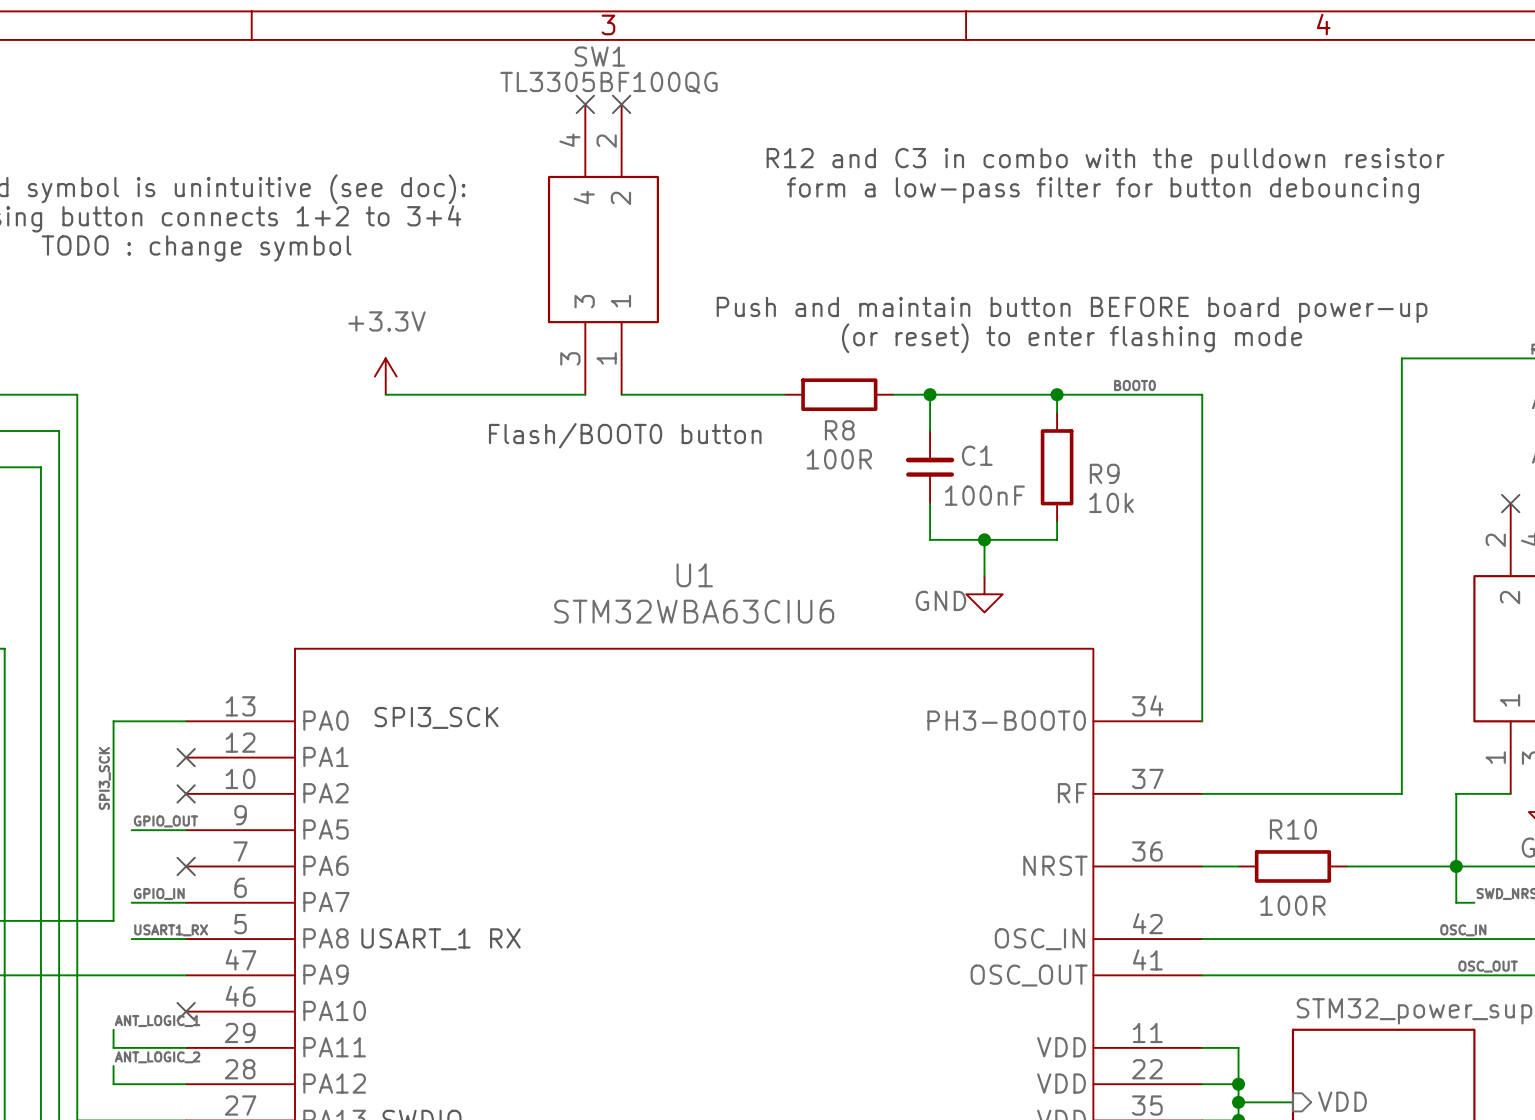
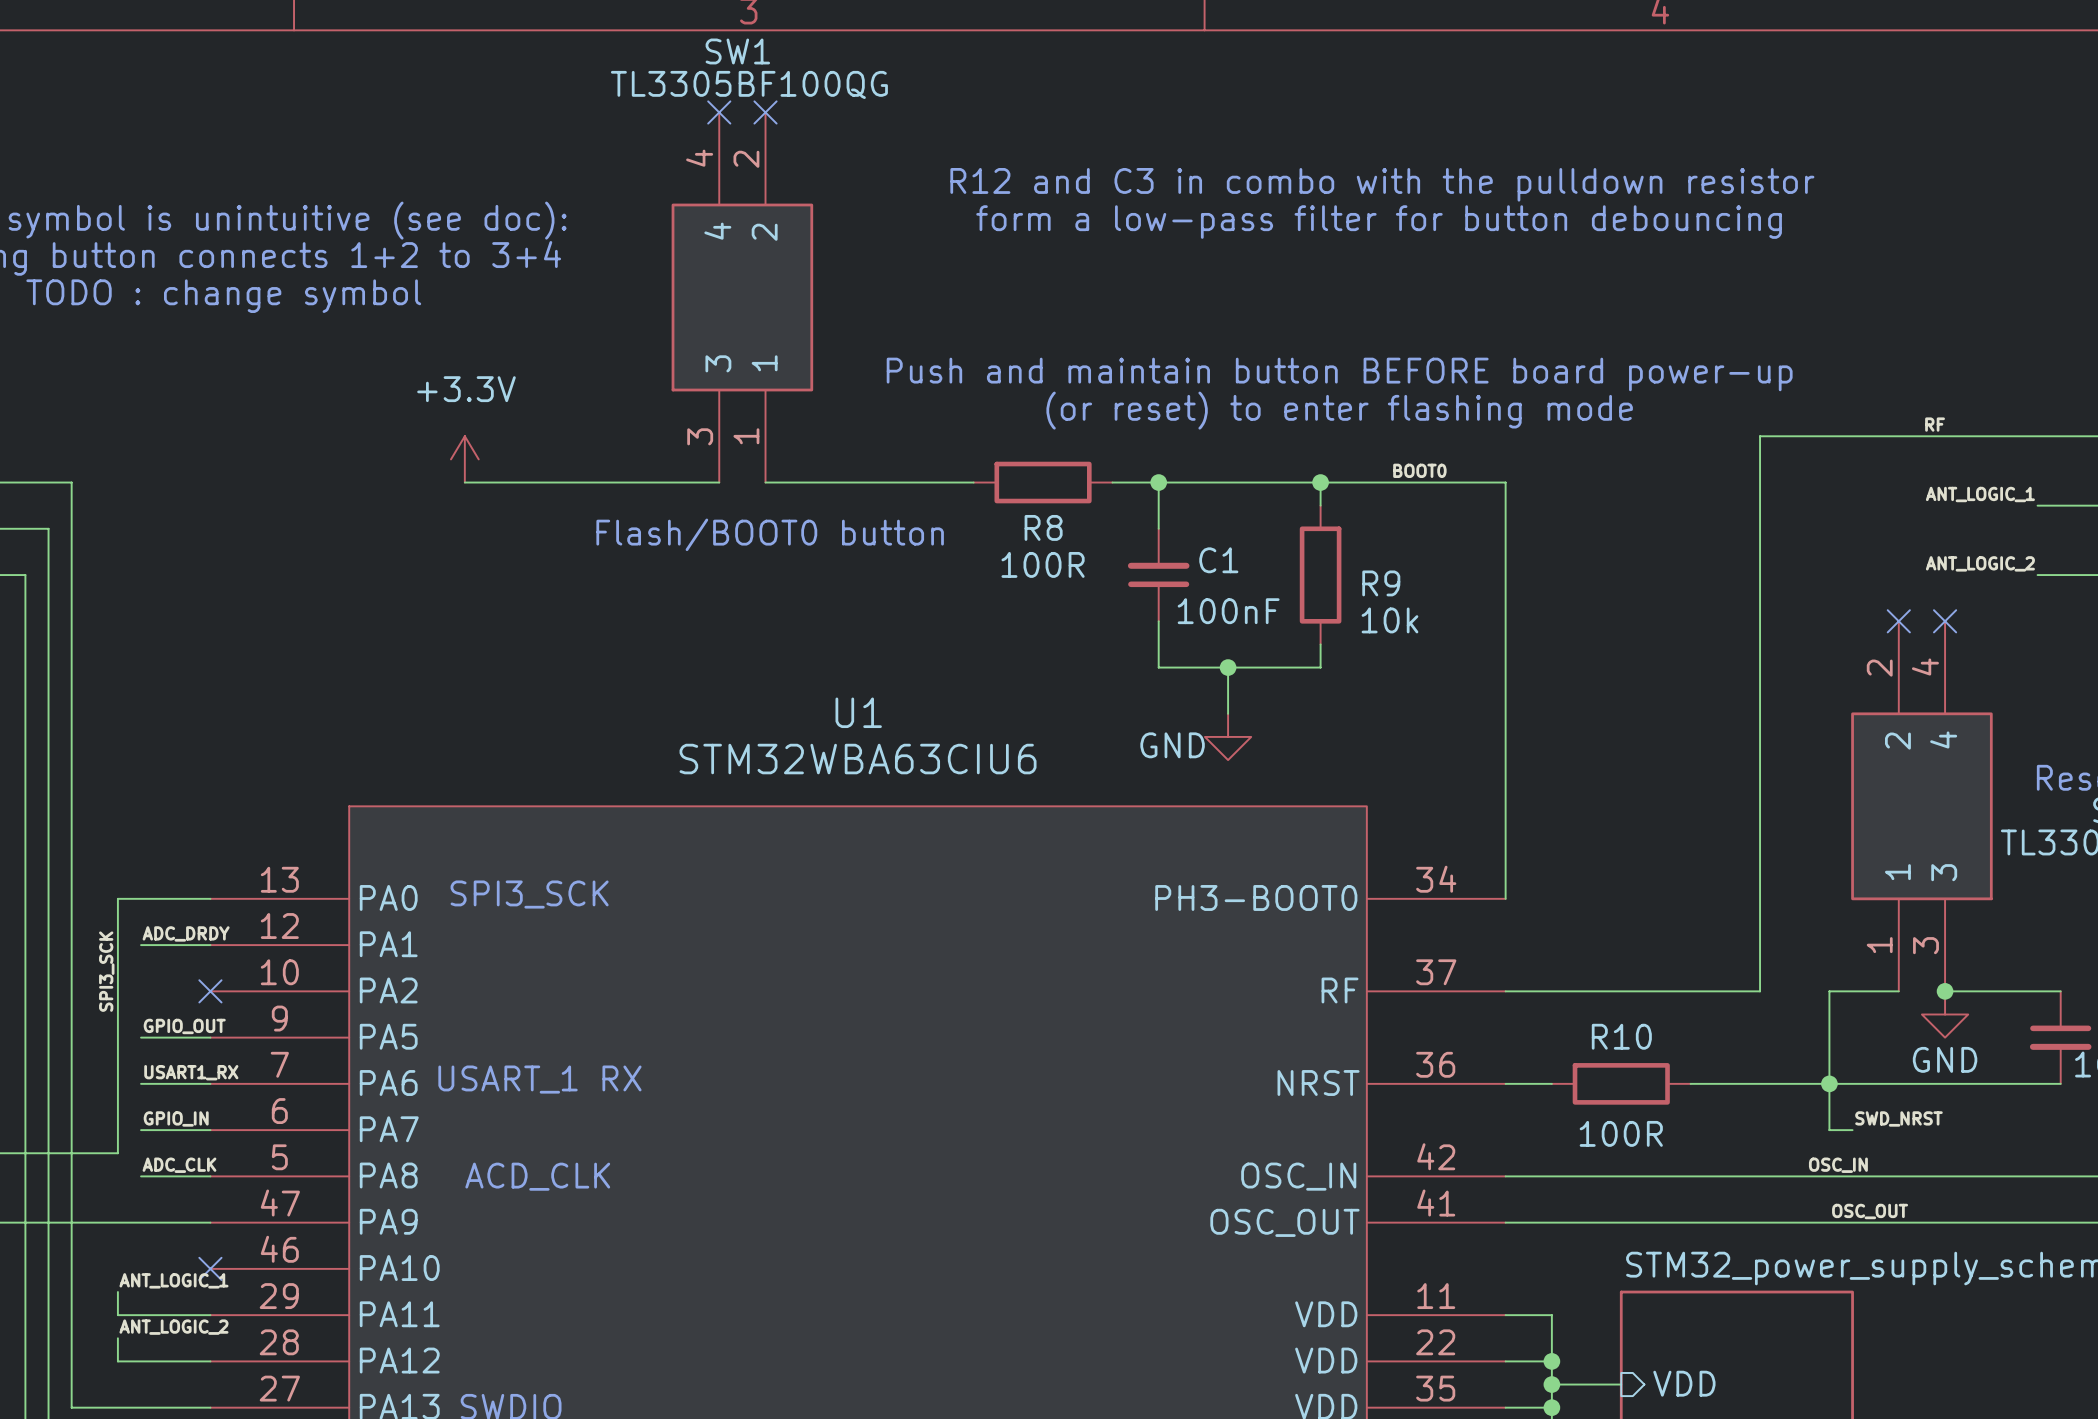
label: none -> ADC_DRDY (186, 933)
wire: none -> (141, 945) (210, 945)
no-connect mark: (186, 757) -> none
label: none -> USART1_RX (191, 1072)
text: none -> USART_1 RX (539, 1079)
wire: none -> (141, 1083) (210, 1083)
no-connect mark: (186, 866) -> none
label: USART1_RX (171, 930) -> ADC_CLK (179, 1165)
text: USART_1 RX (441, 939) -> ACD_CLK (537, 1176)

